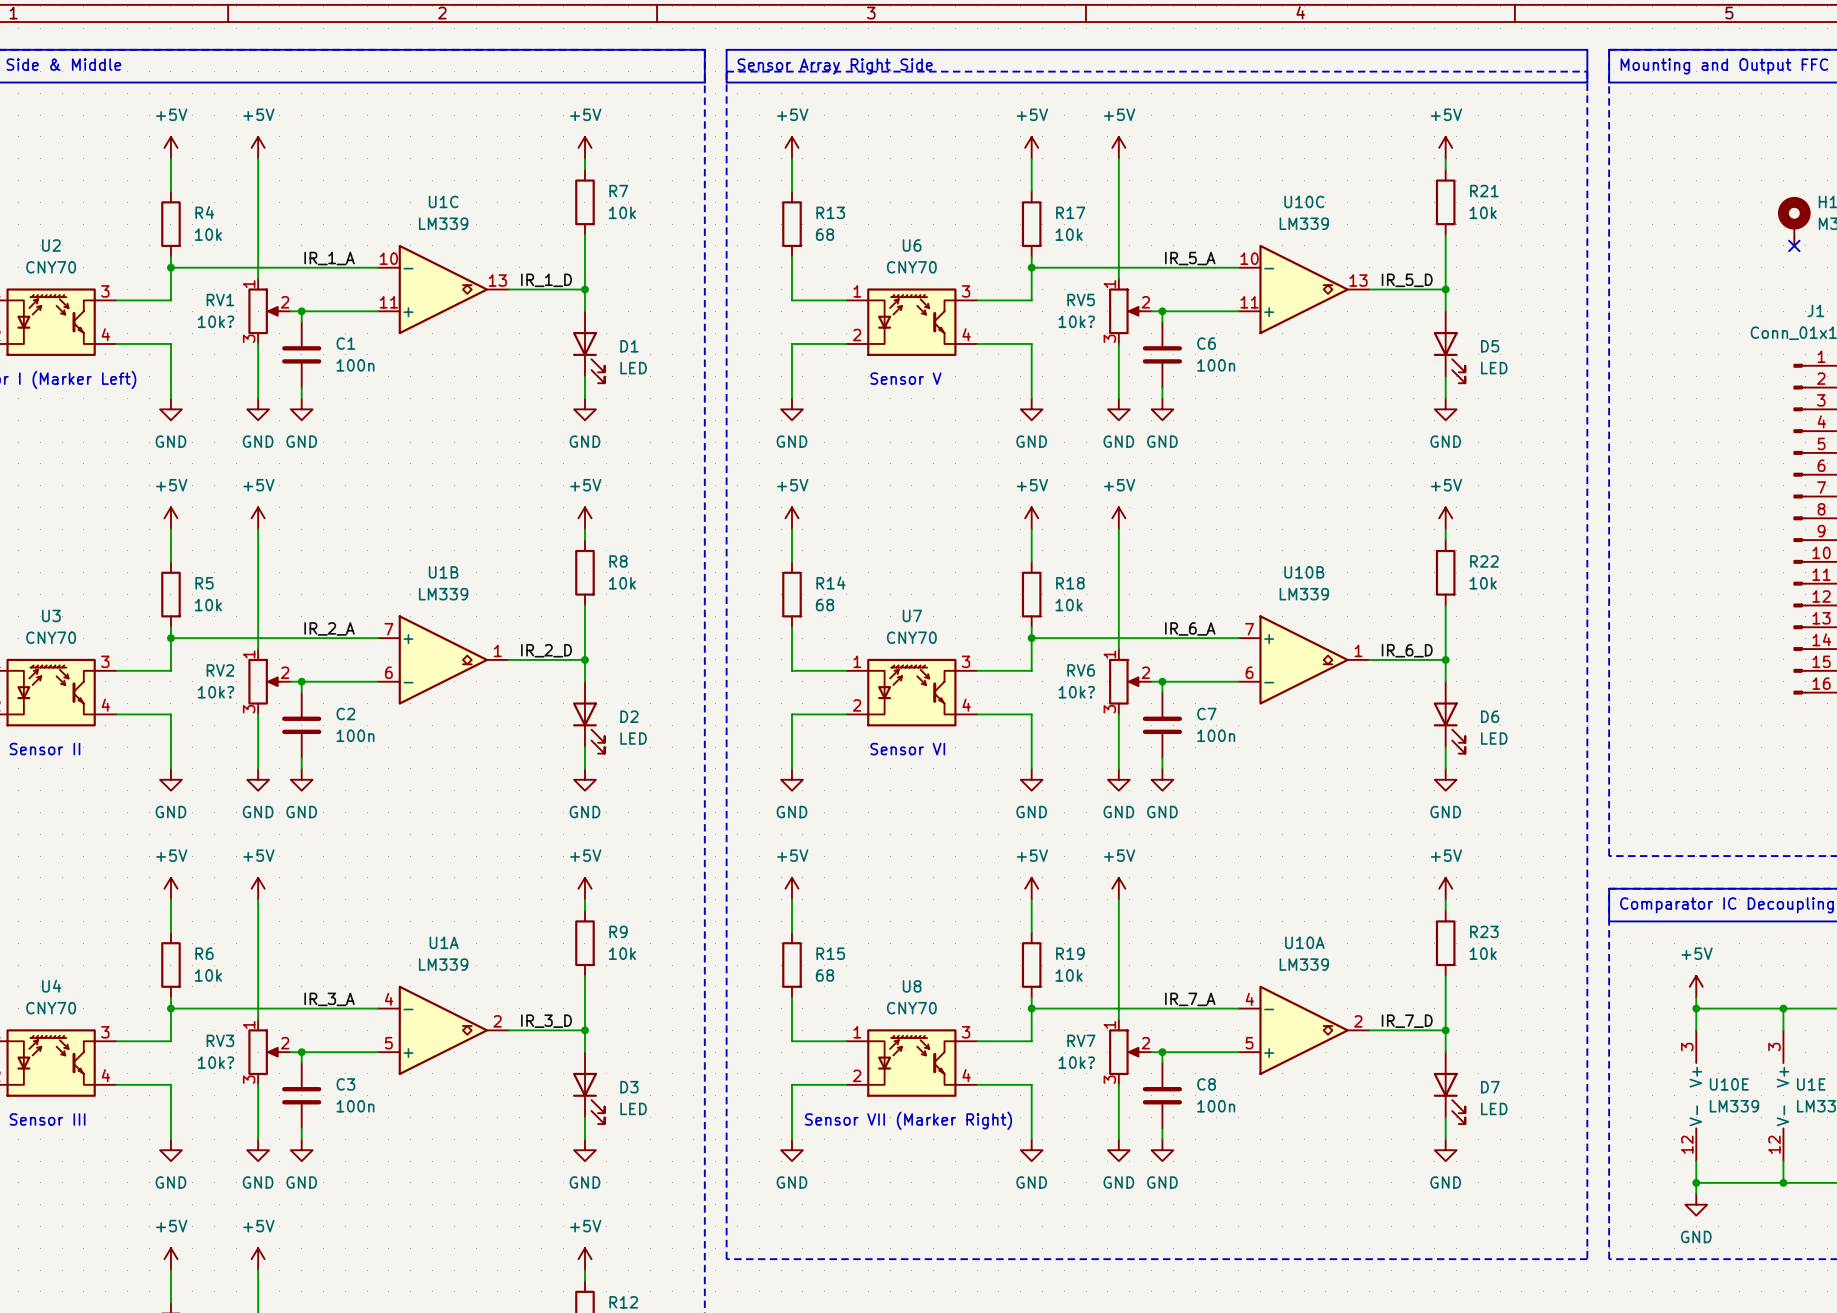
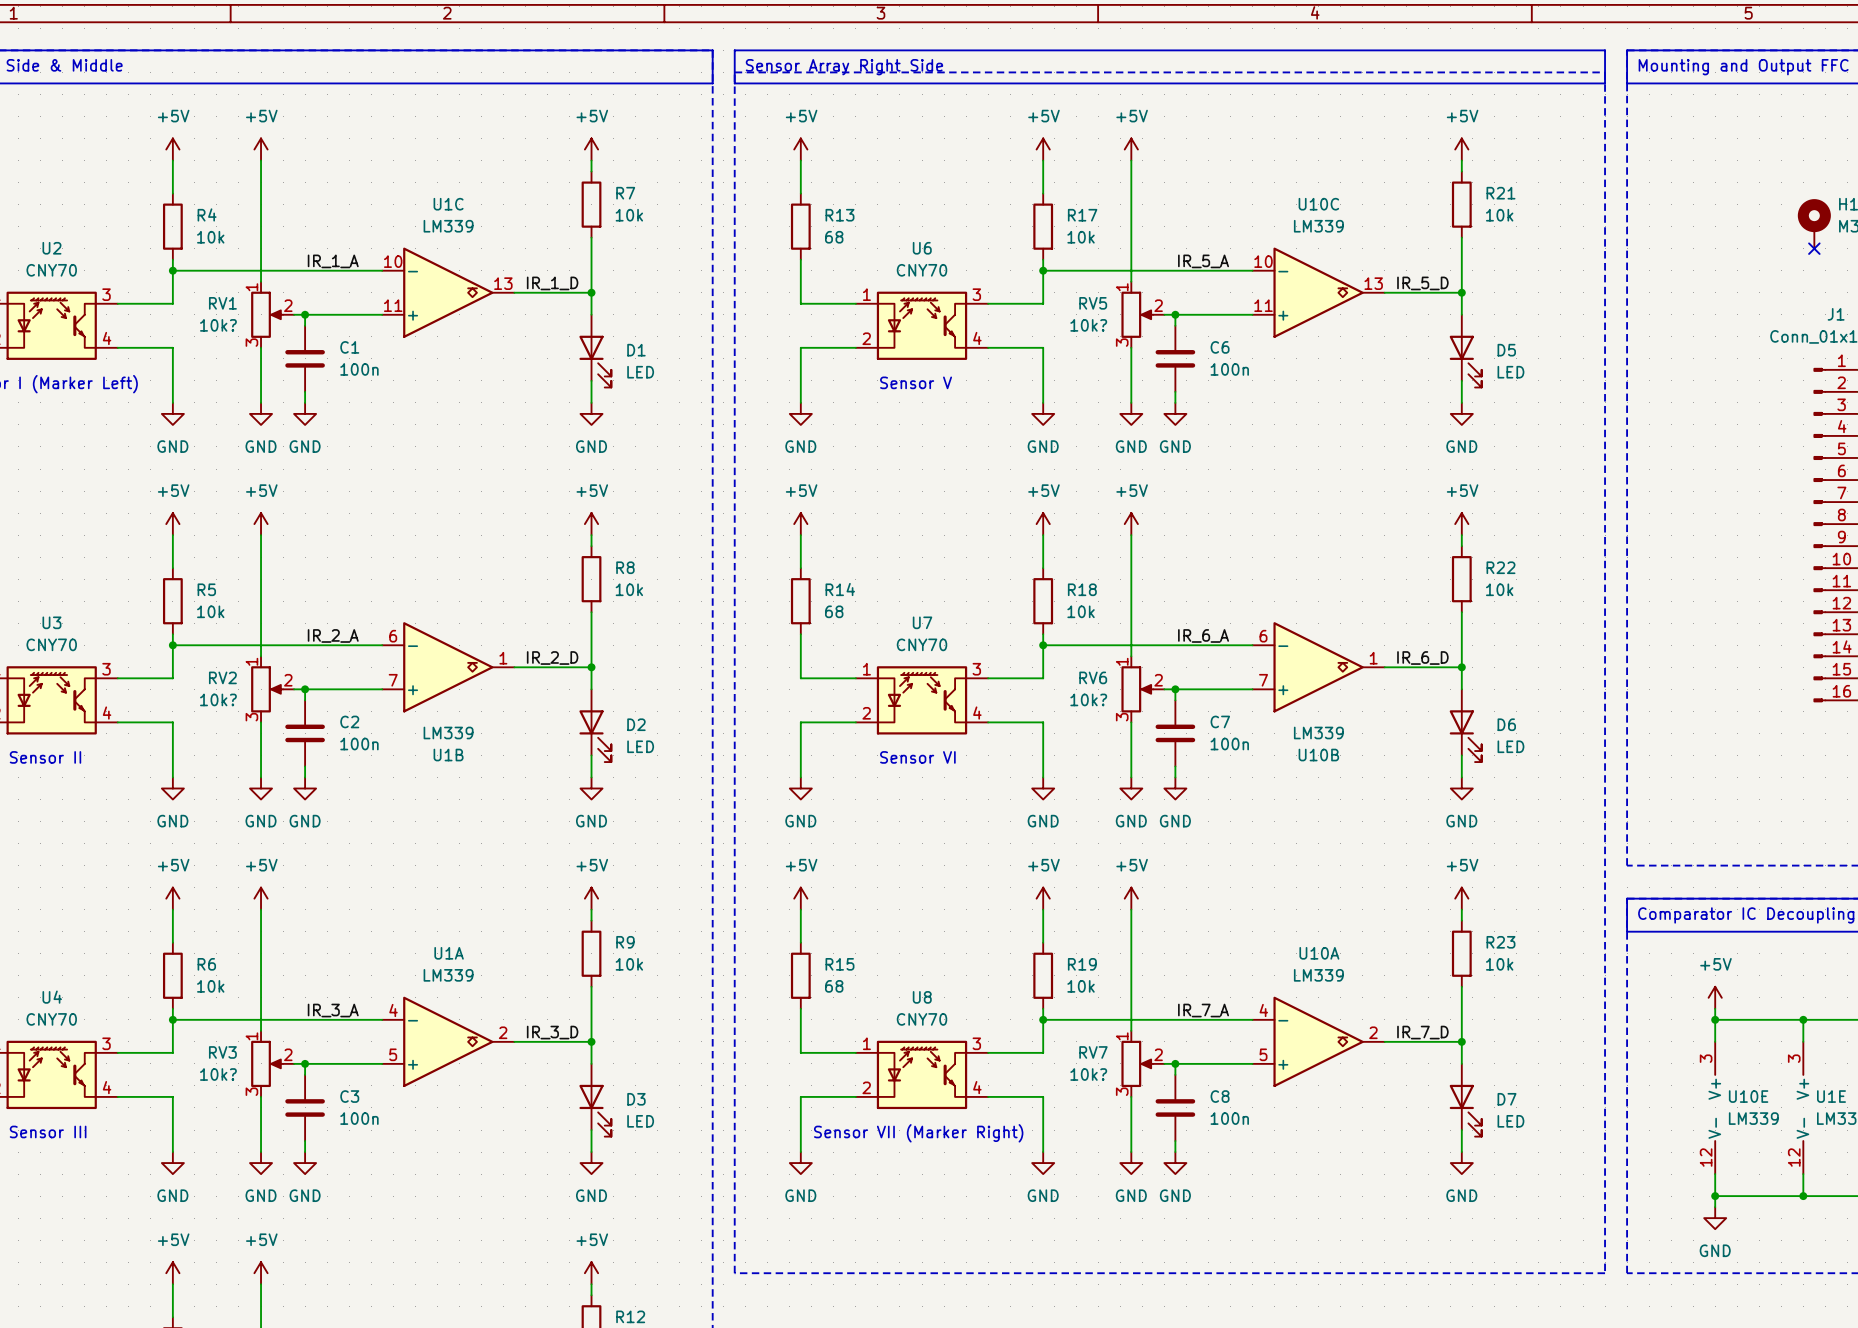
U1B flip: as is (443, 659) -> up-down (448, 667)
U10B flip: as is (1304, 659) -> up-down (1318, 667)

